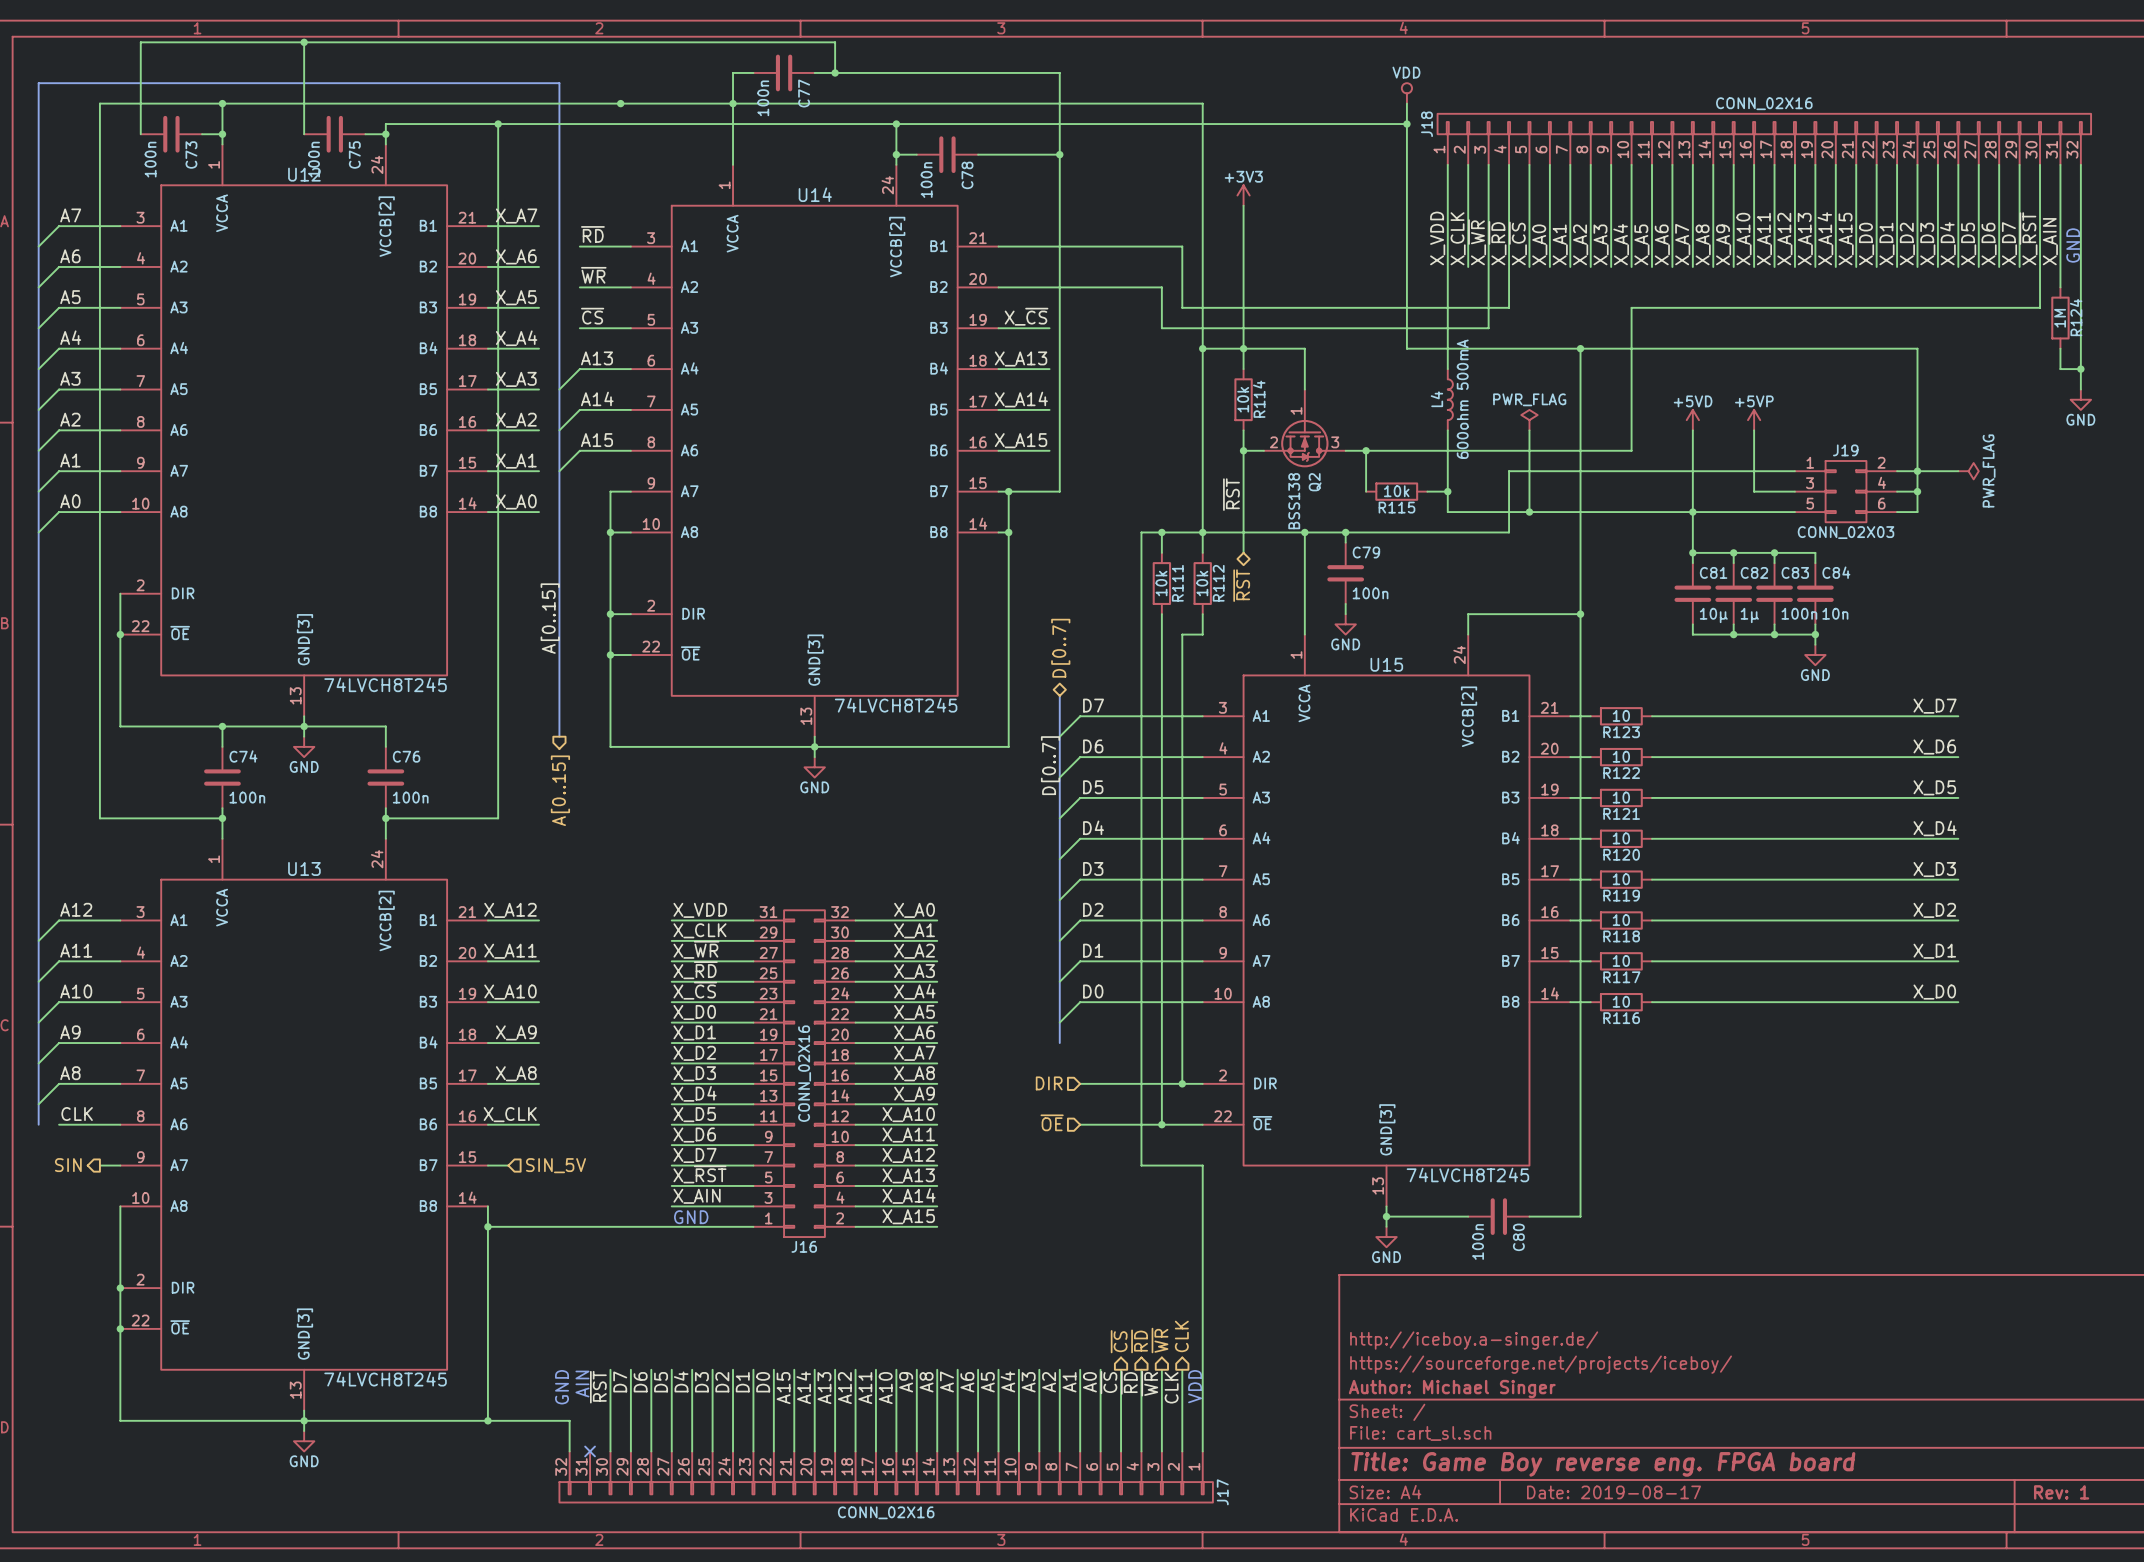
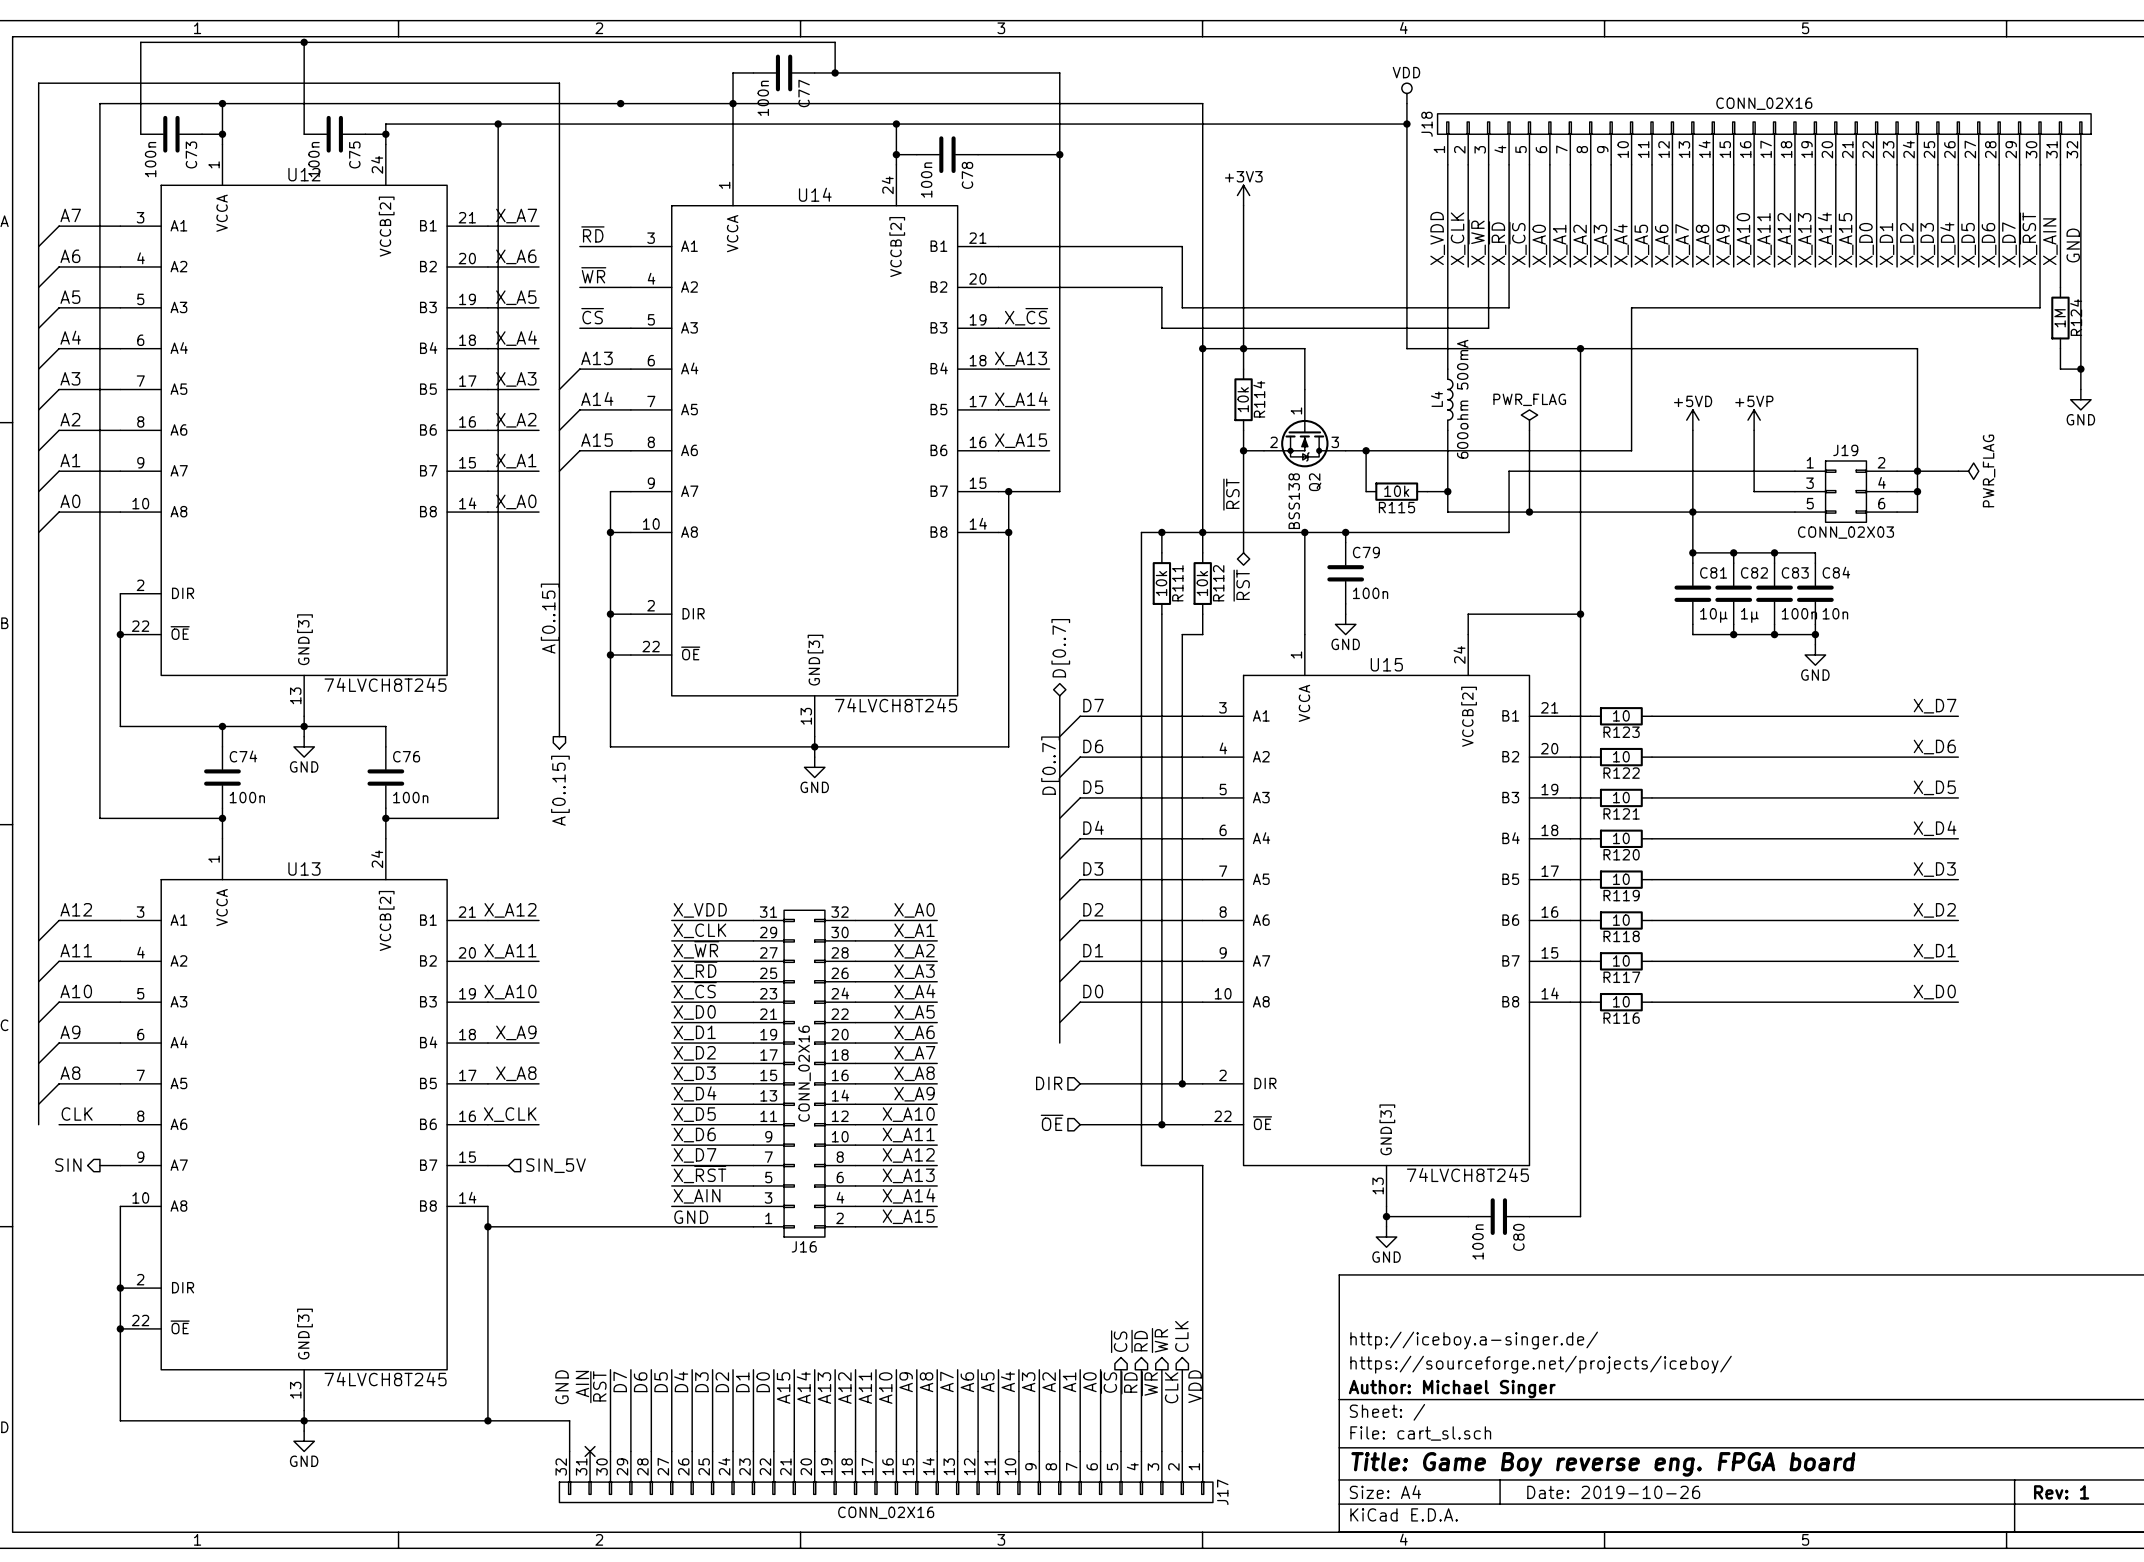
title block: Date: 2019-08-17 (1614, 1492) -> Date: 2019-10-26 (1613, 1492)

